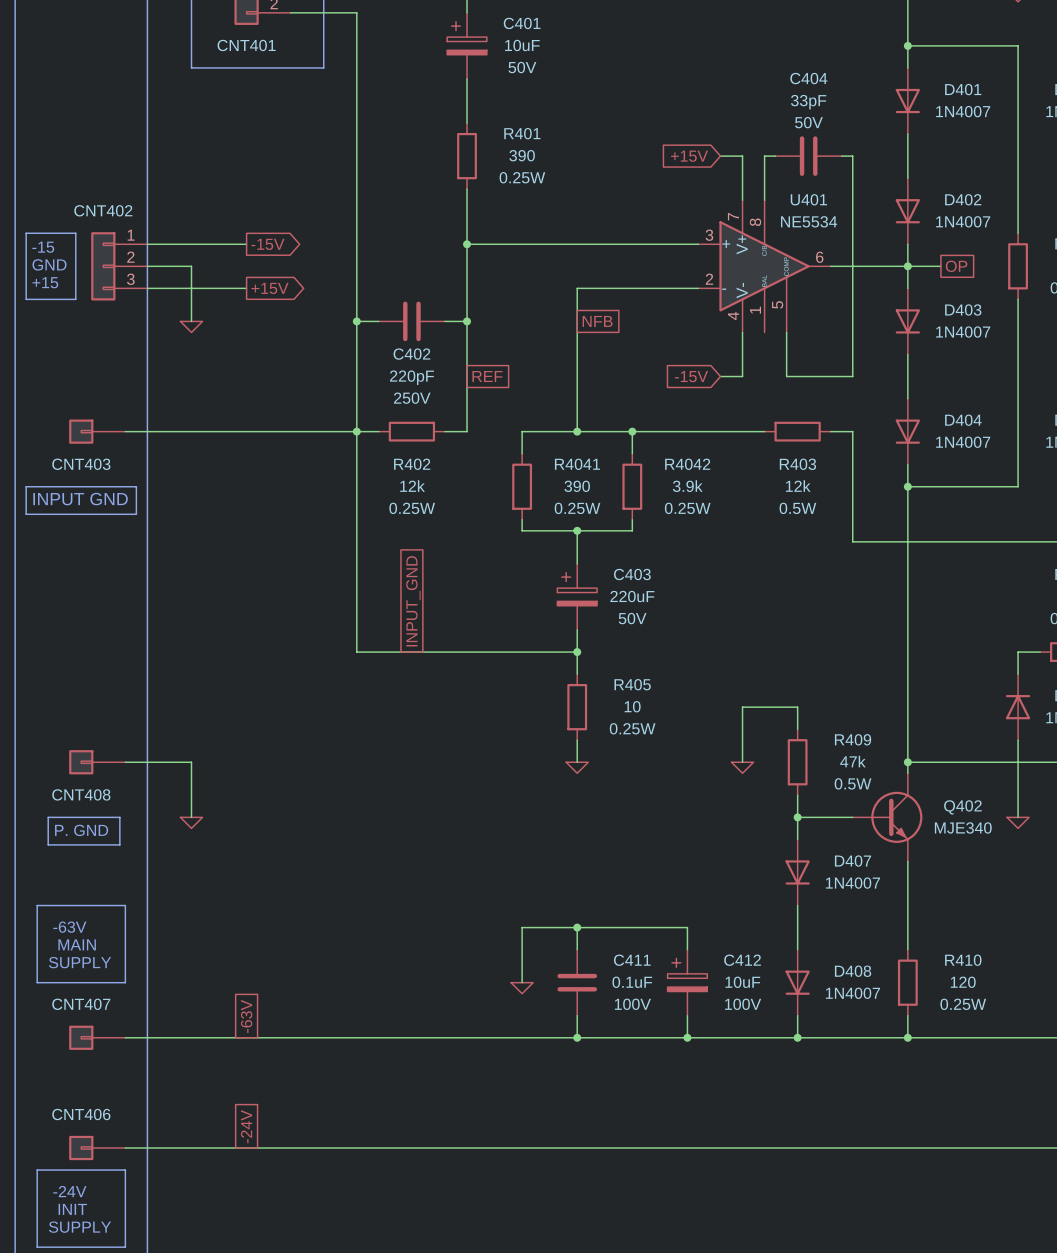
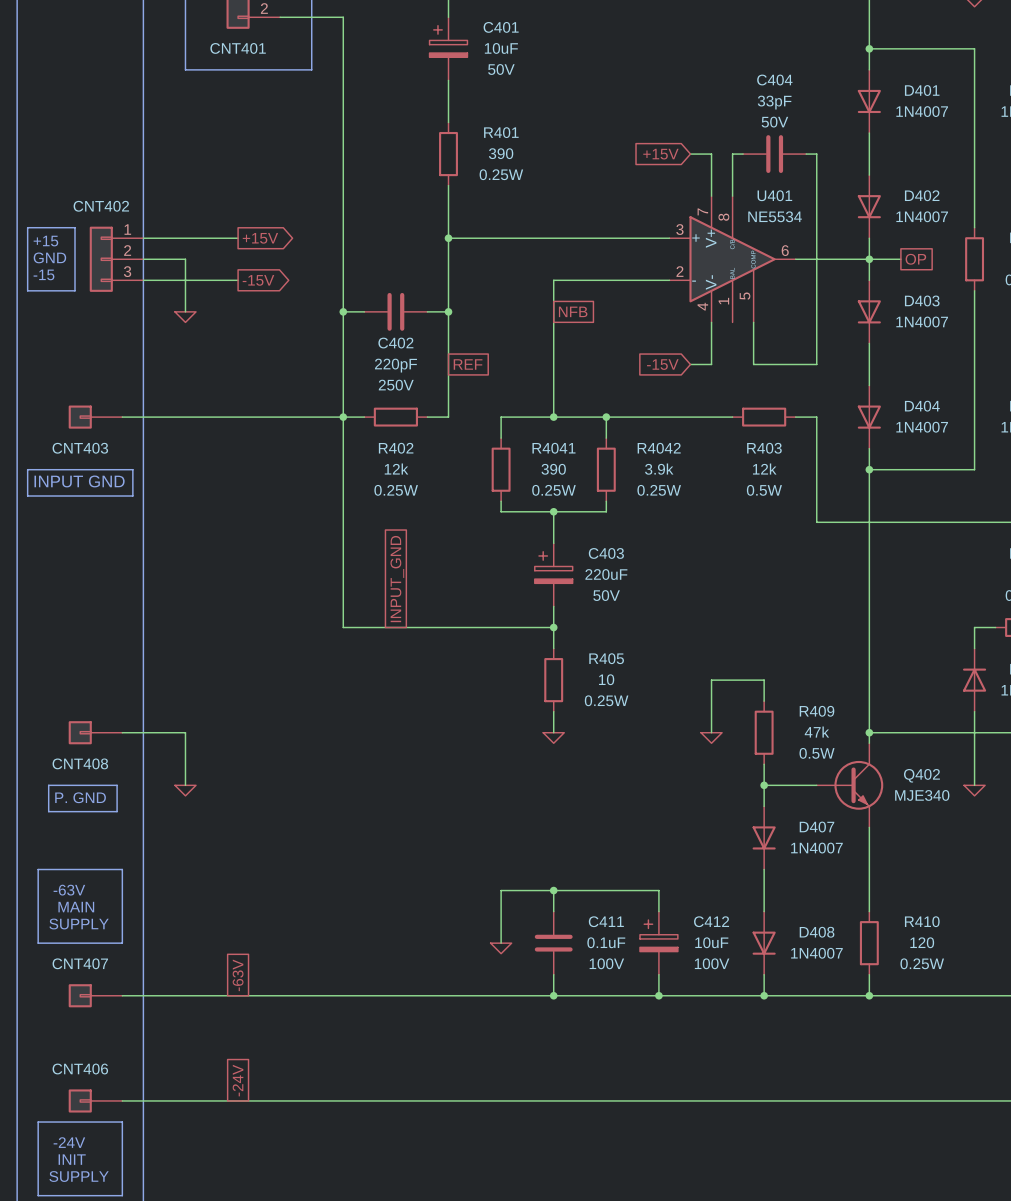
global label: -15V (267, 244) -> +15V (260, 238)
text: -15 (43, 247) -> +15 (45, 241)
text: +15 (45, 282) -> -15 (43, 274)
global label: +15V (270, 288) -> -15V (258, 280)

